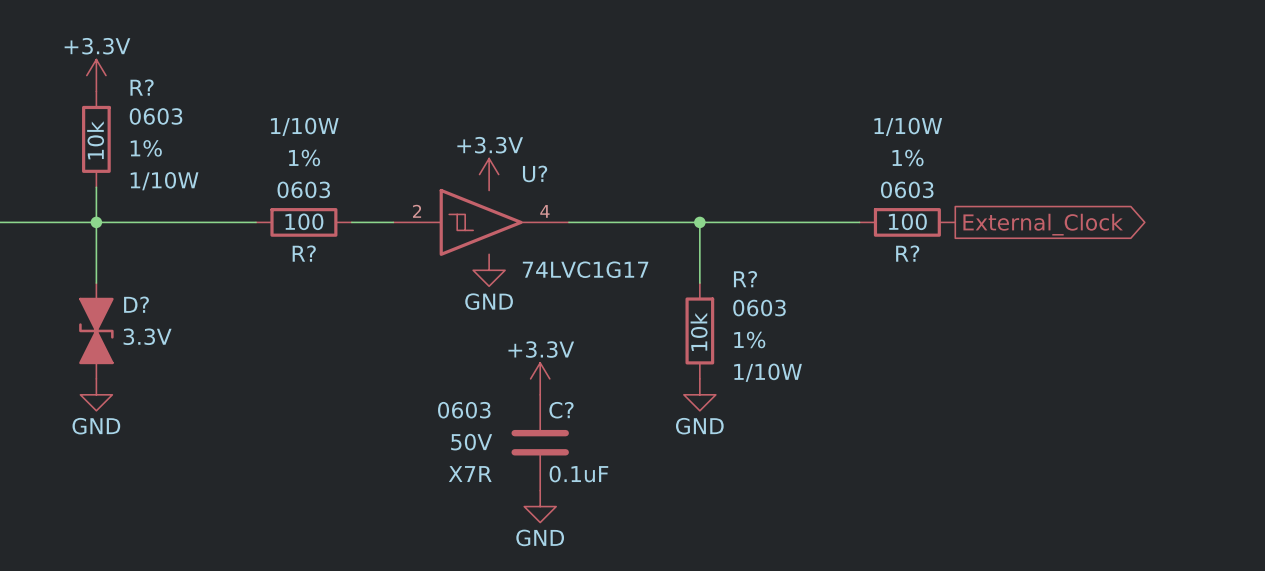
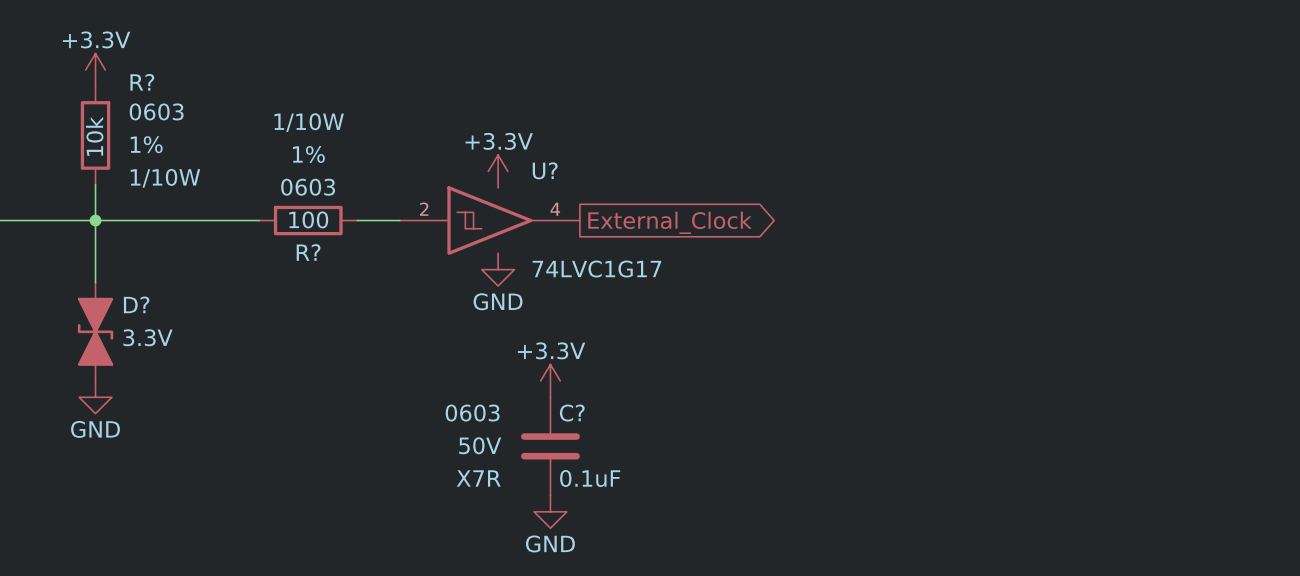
wire: (568, 222) (859, 222) -> none
wire: (699, 222) (699, 283) -> none
junction: (699, 222) -> none
R?: 100 (907, 222) -> none
global label: none -> External_Clock (669, 222)
global label: External_Clock (1043, 224) -> none
R?: 10k (699, 330) -> none
power symbol: GND (699, 394) -> none

